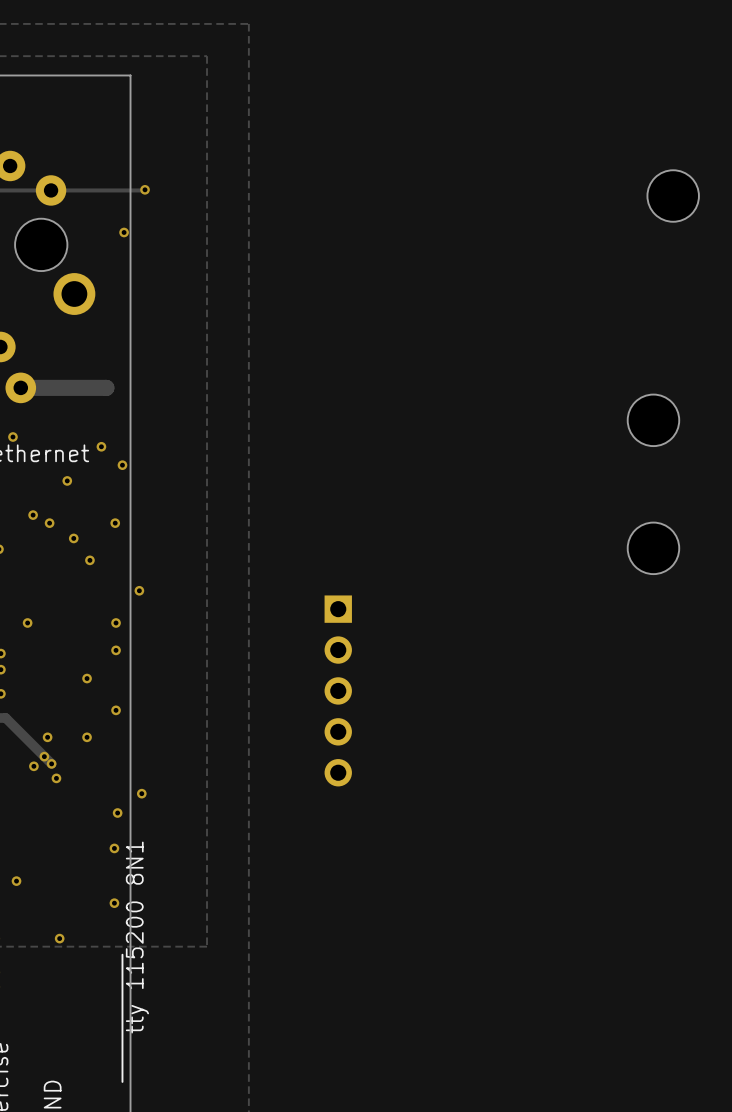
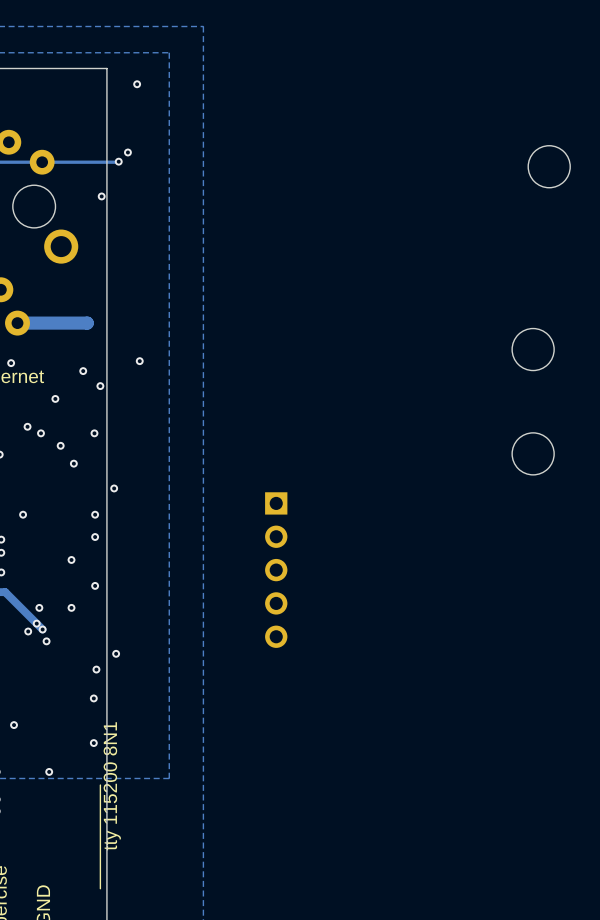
via: none -> (137, 84)
via: none -> (127, 152)
via: none -> (139, 361)

